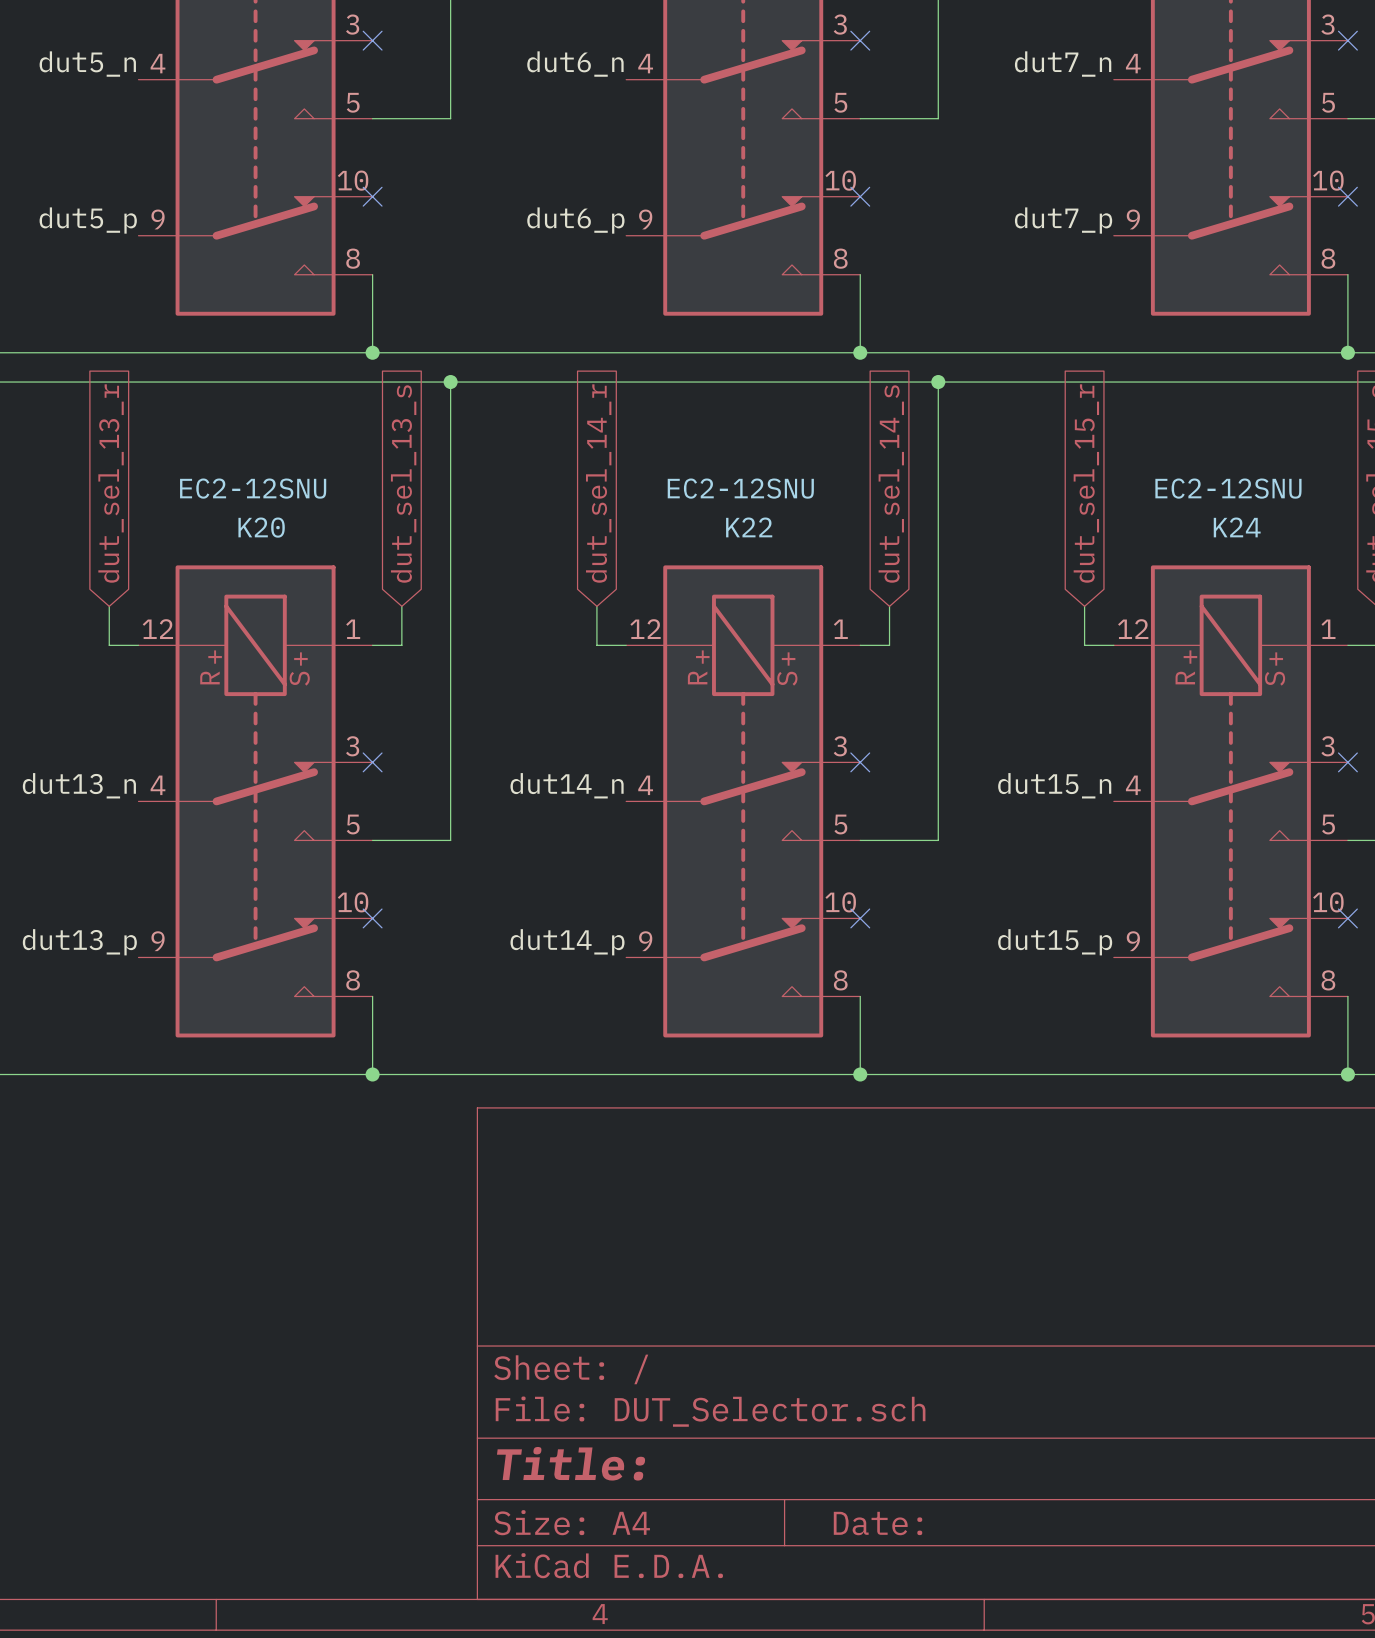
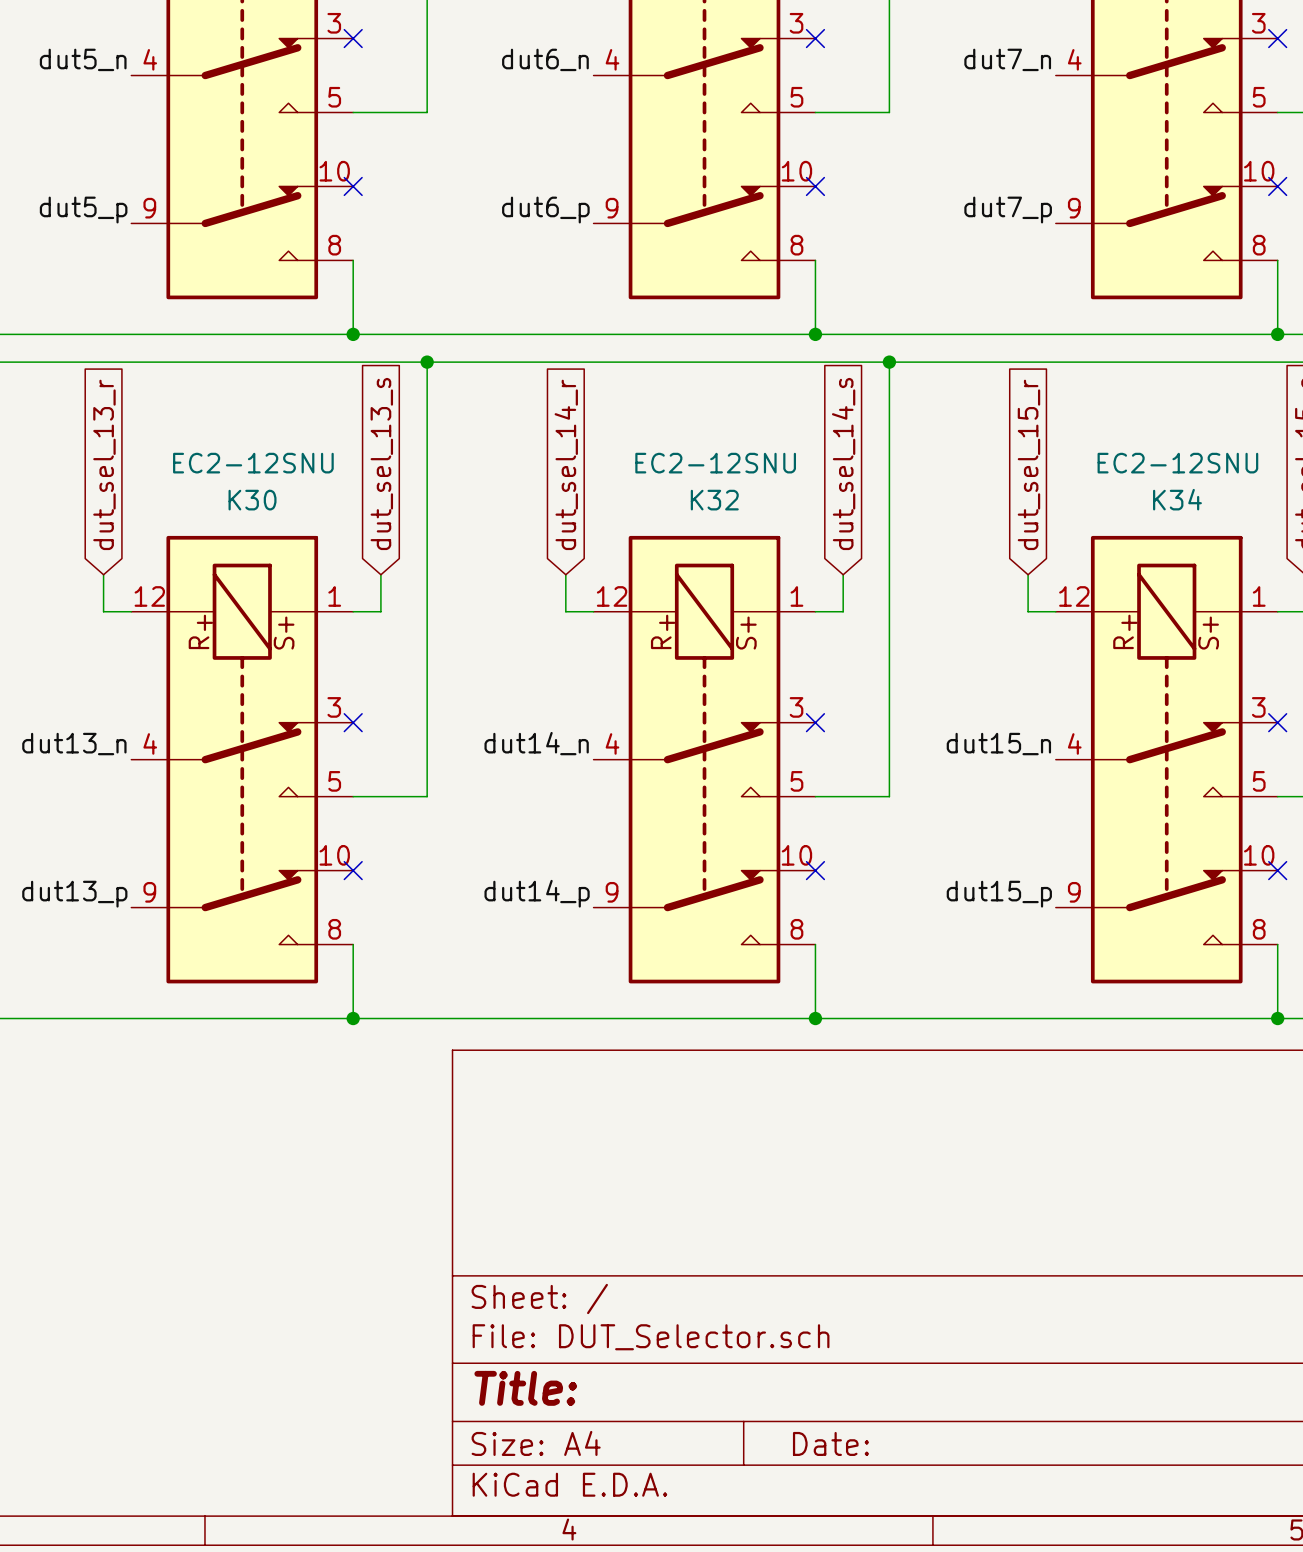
K20 name: K20 (261, 527) -> K30 (252, 500)
K22 name: K22 (749, 527) -> K32 (714, 500)
K24 name: K24 (1237, 527) -> K34 (1177, 499)

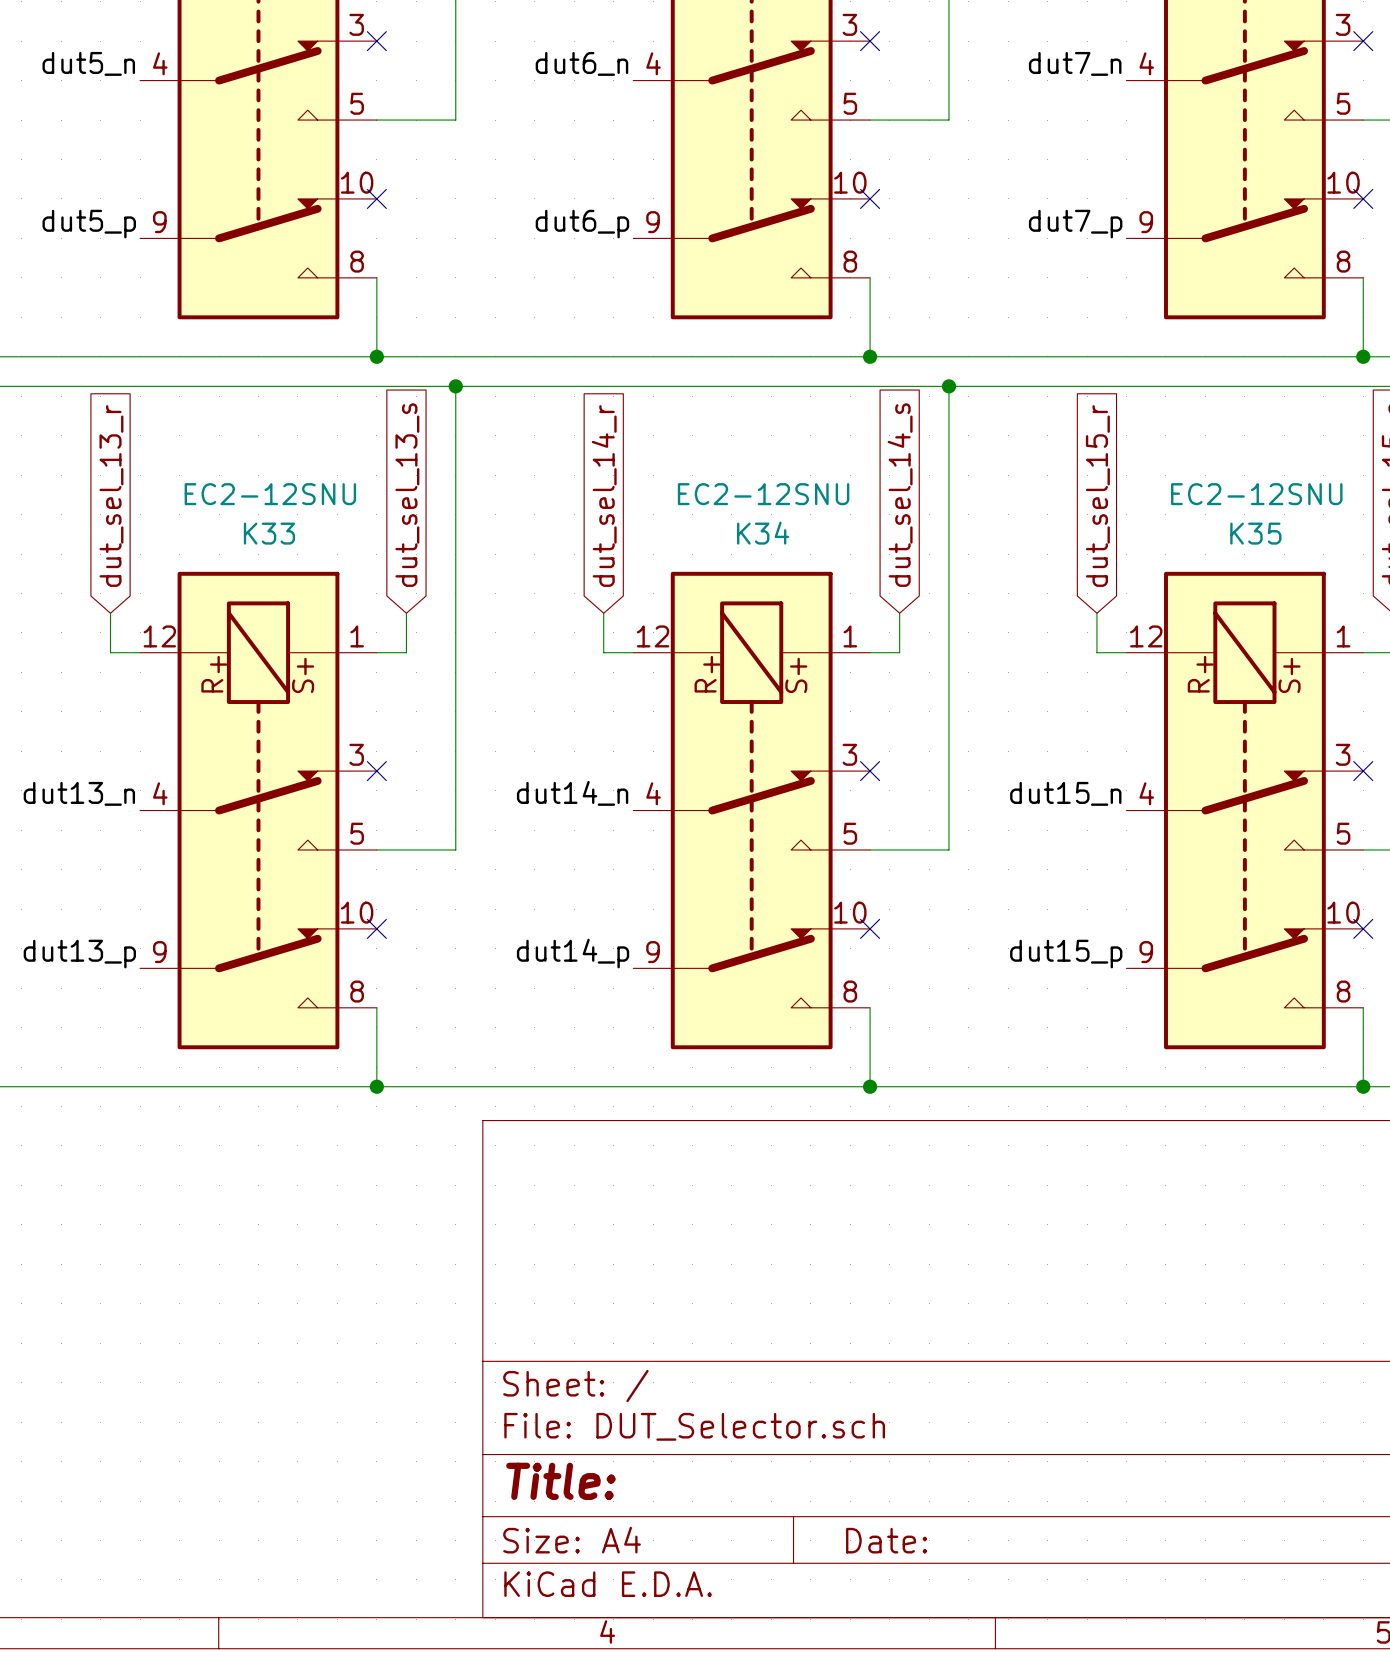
K34 name: K34 (1177, 499) -> K35 (1255, 533)
K30 name: K30 (252, 500) -> K33 (269, 533)
K32 name: K32 (714, 500) -> K34 (763, 533)

